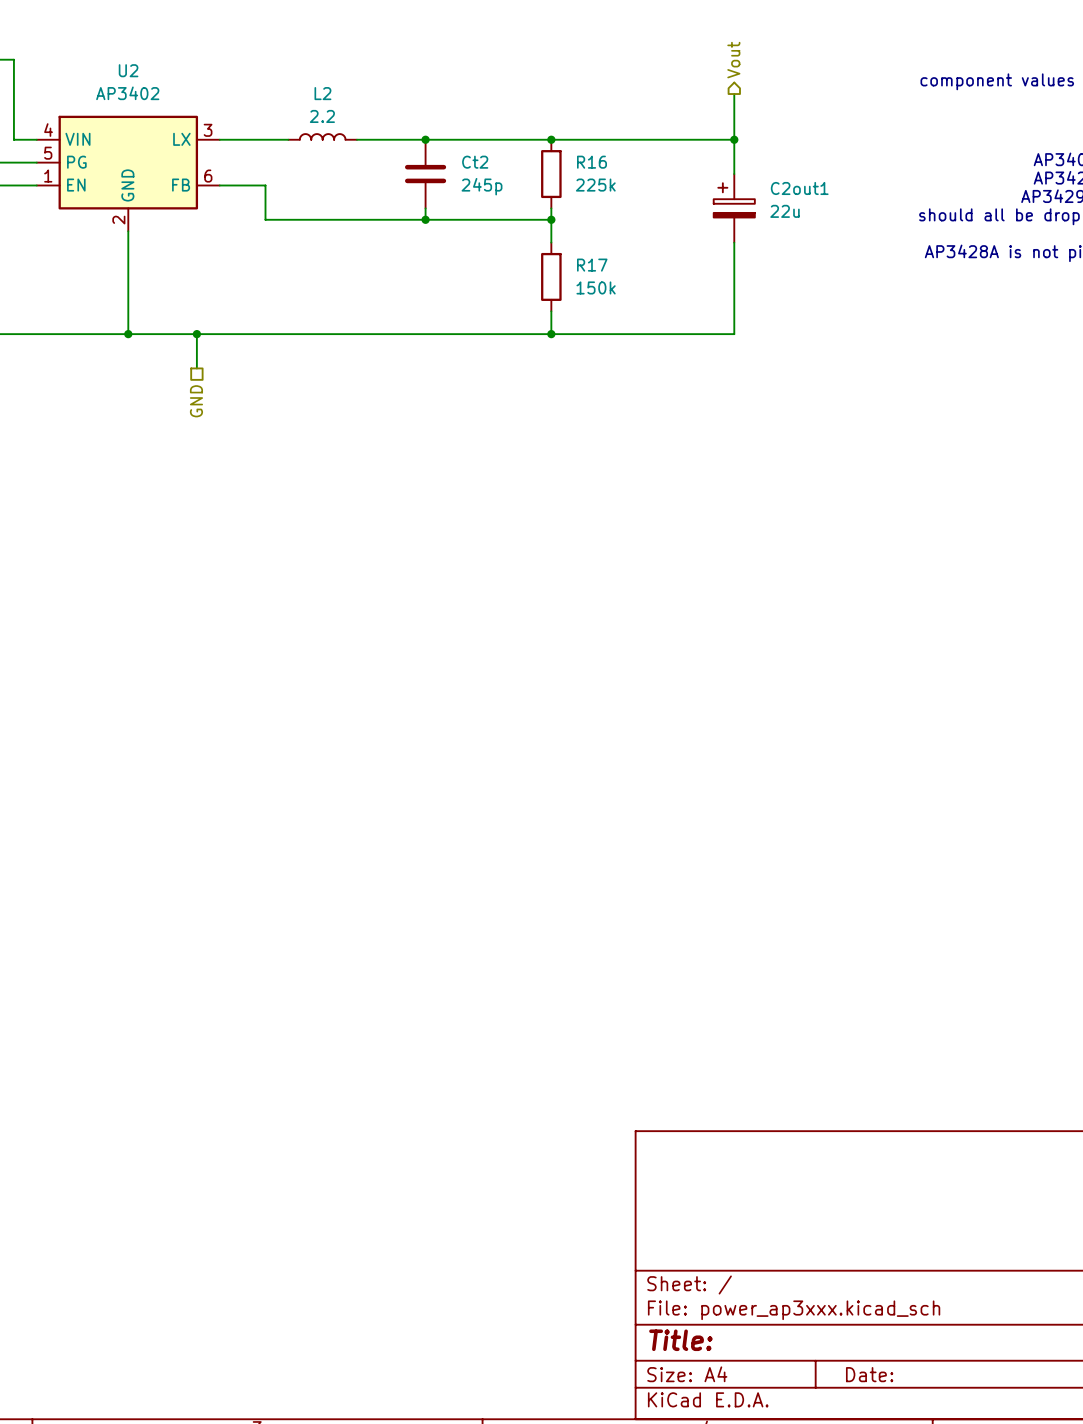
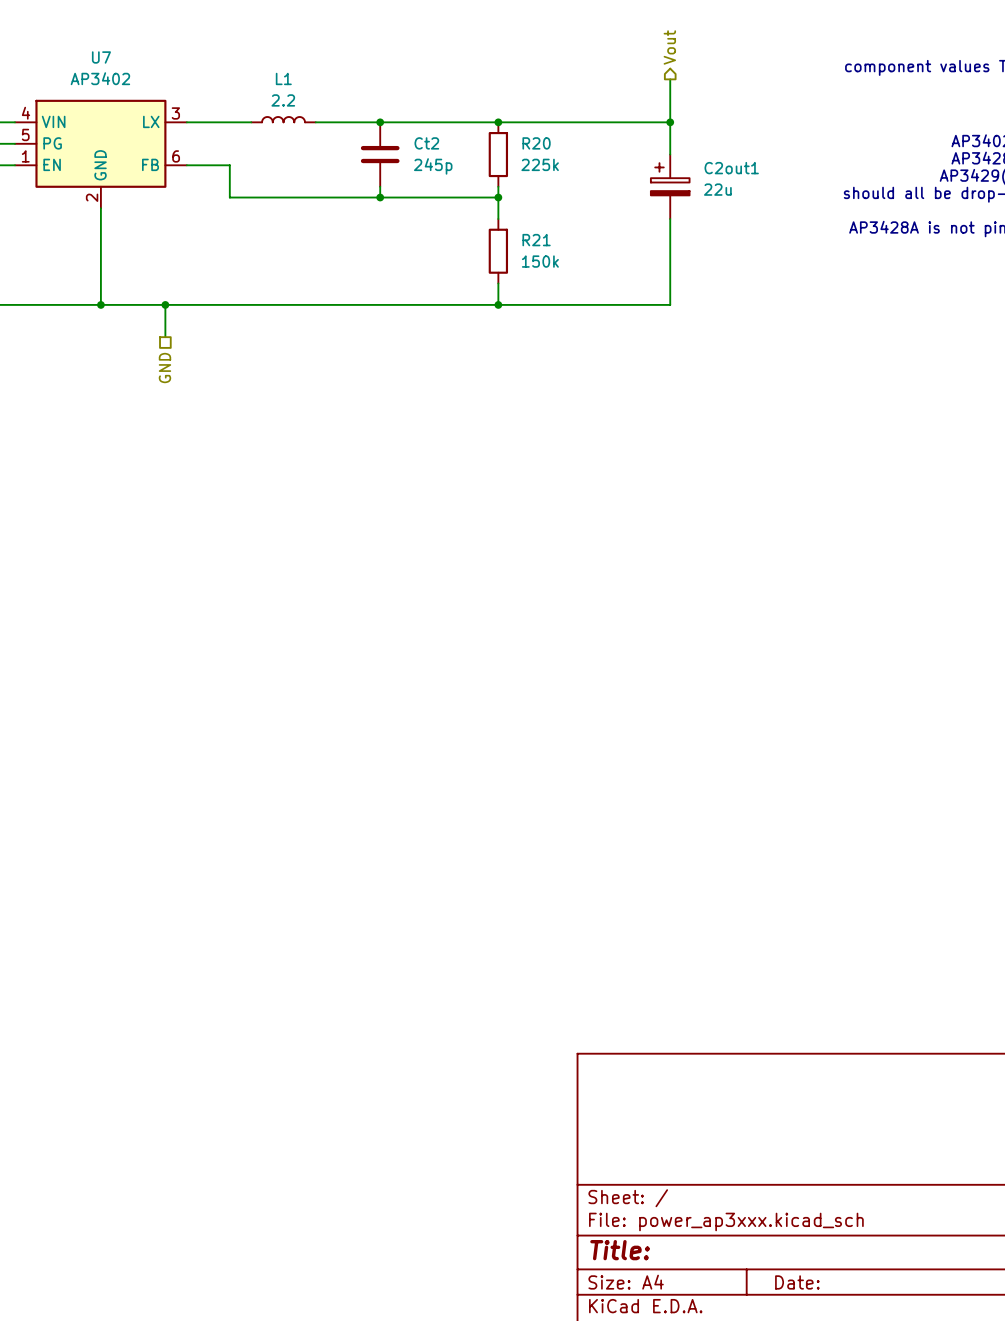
U2 name: U2 (128, 70) -> U7 (101, 57)
L2 name: L2 (322, 93) -> L1 (283, 78)
R16 name: R16 (591, 162) -> R20 (536, 143)
R17 name: R17 (592, 265) -> R21 (536, 240)

